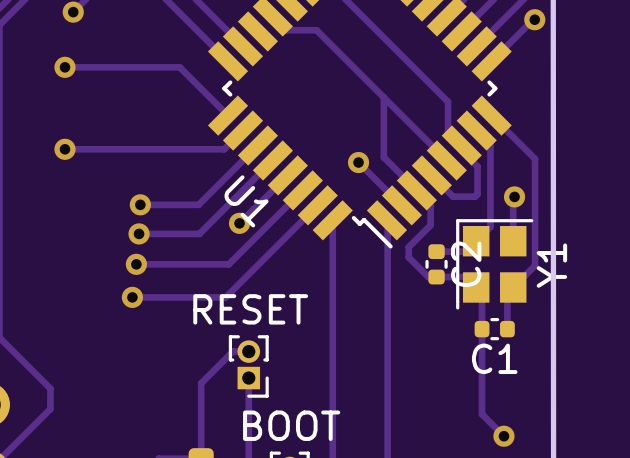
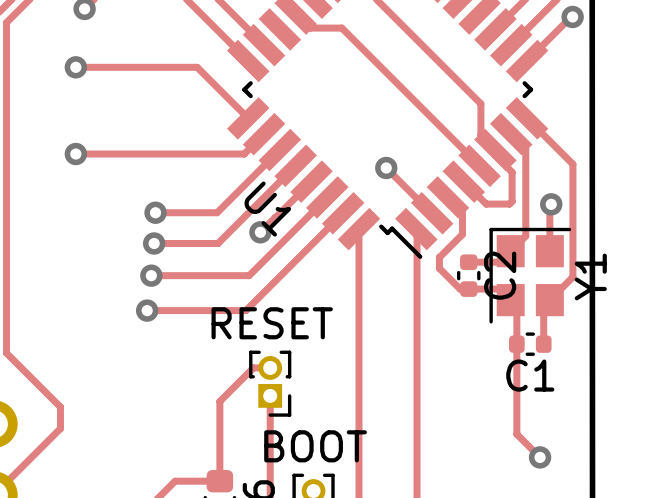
track: (383, 97) (383, 157) (416, 190) -> none

